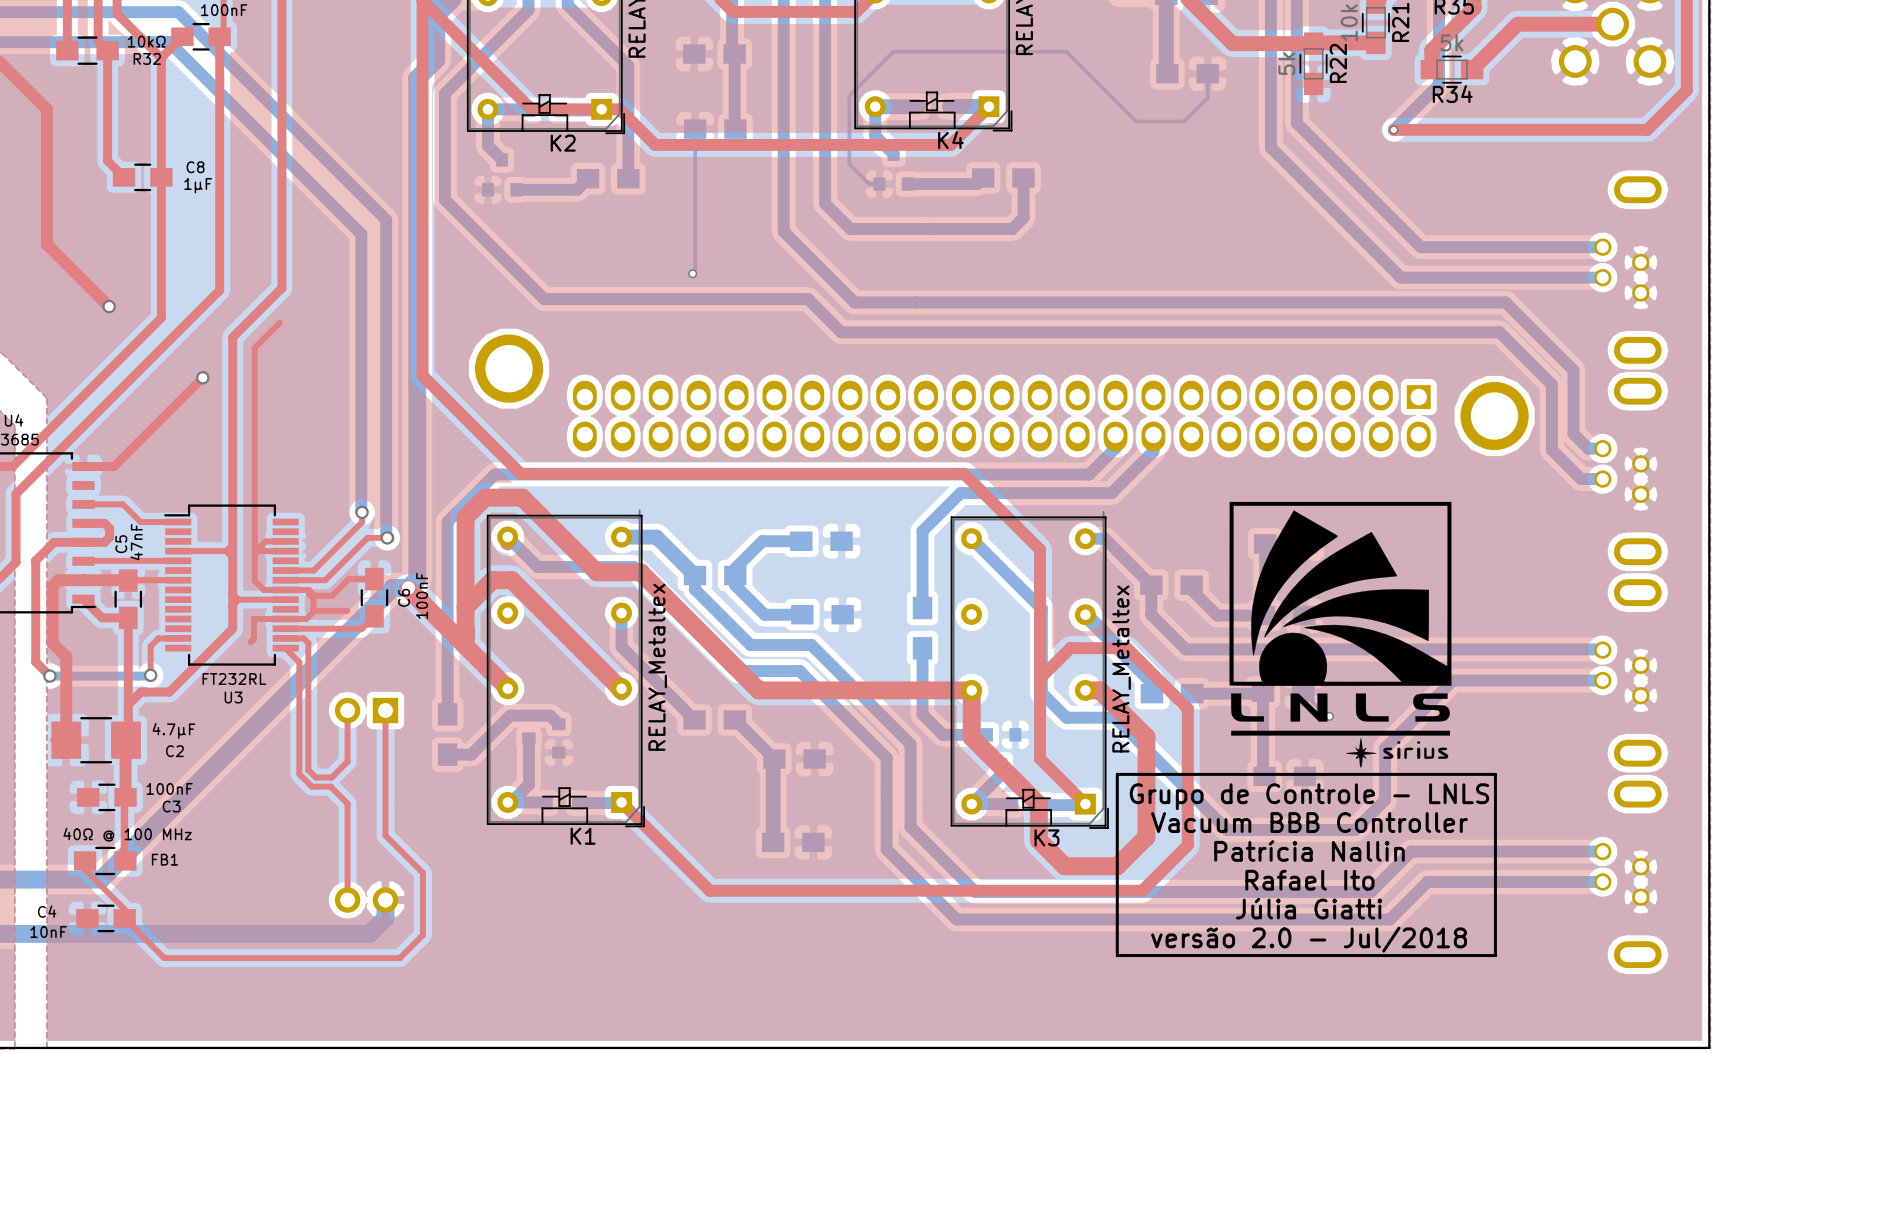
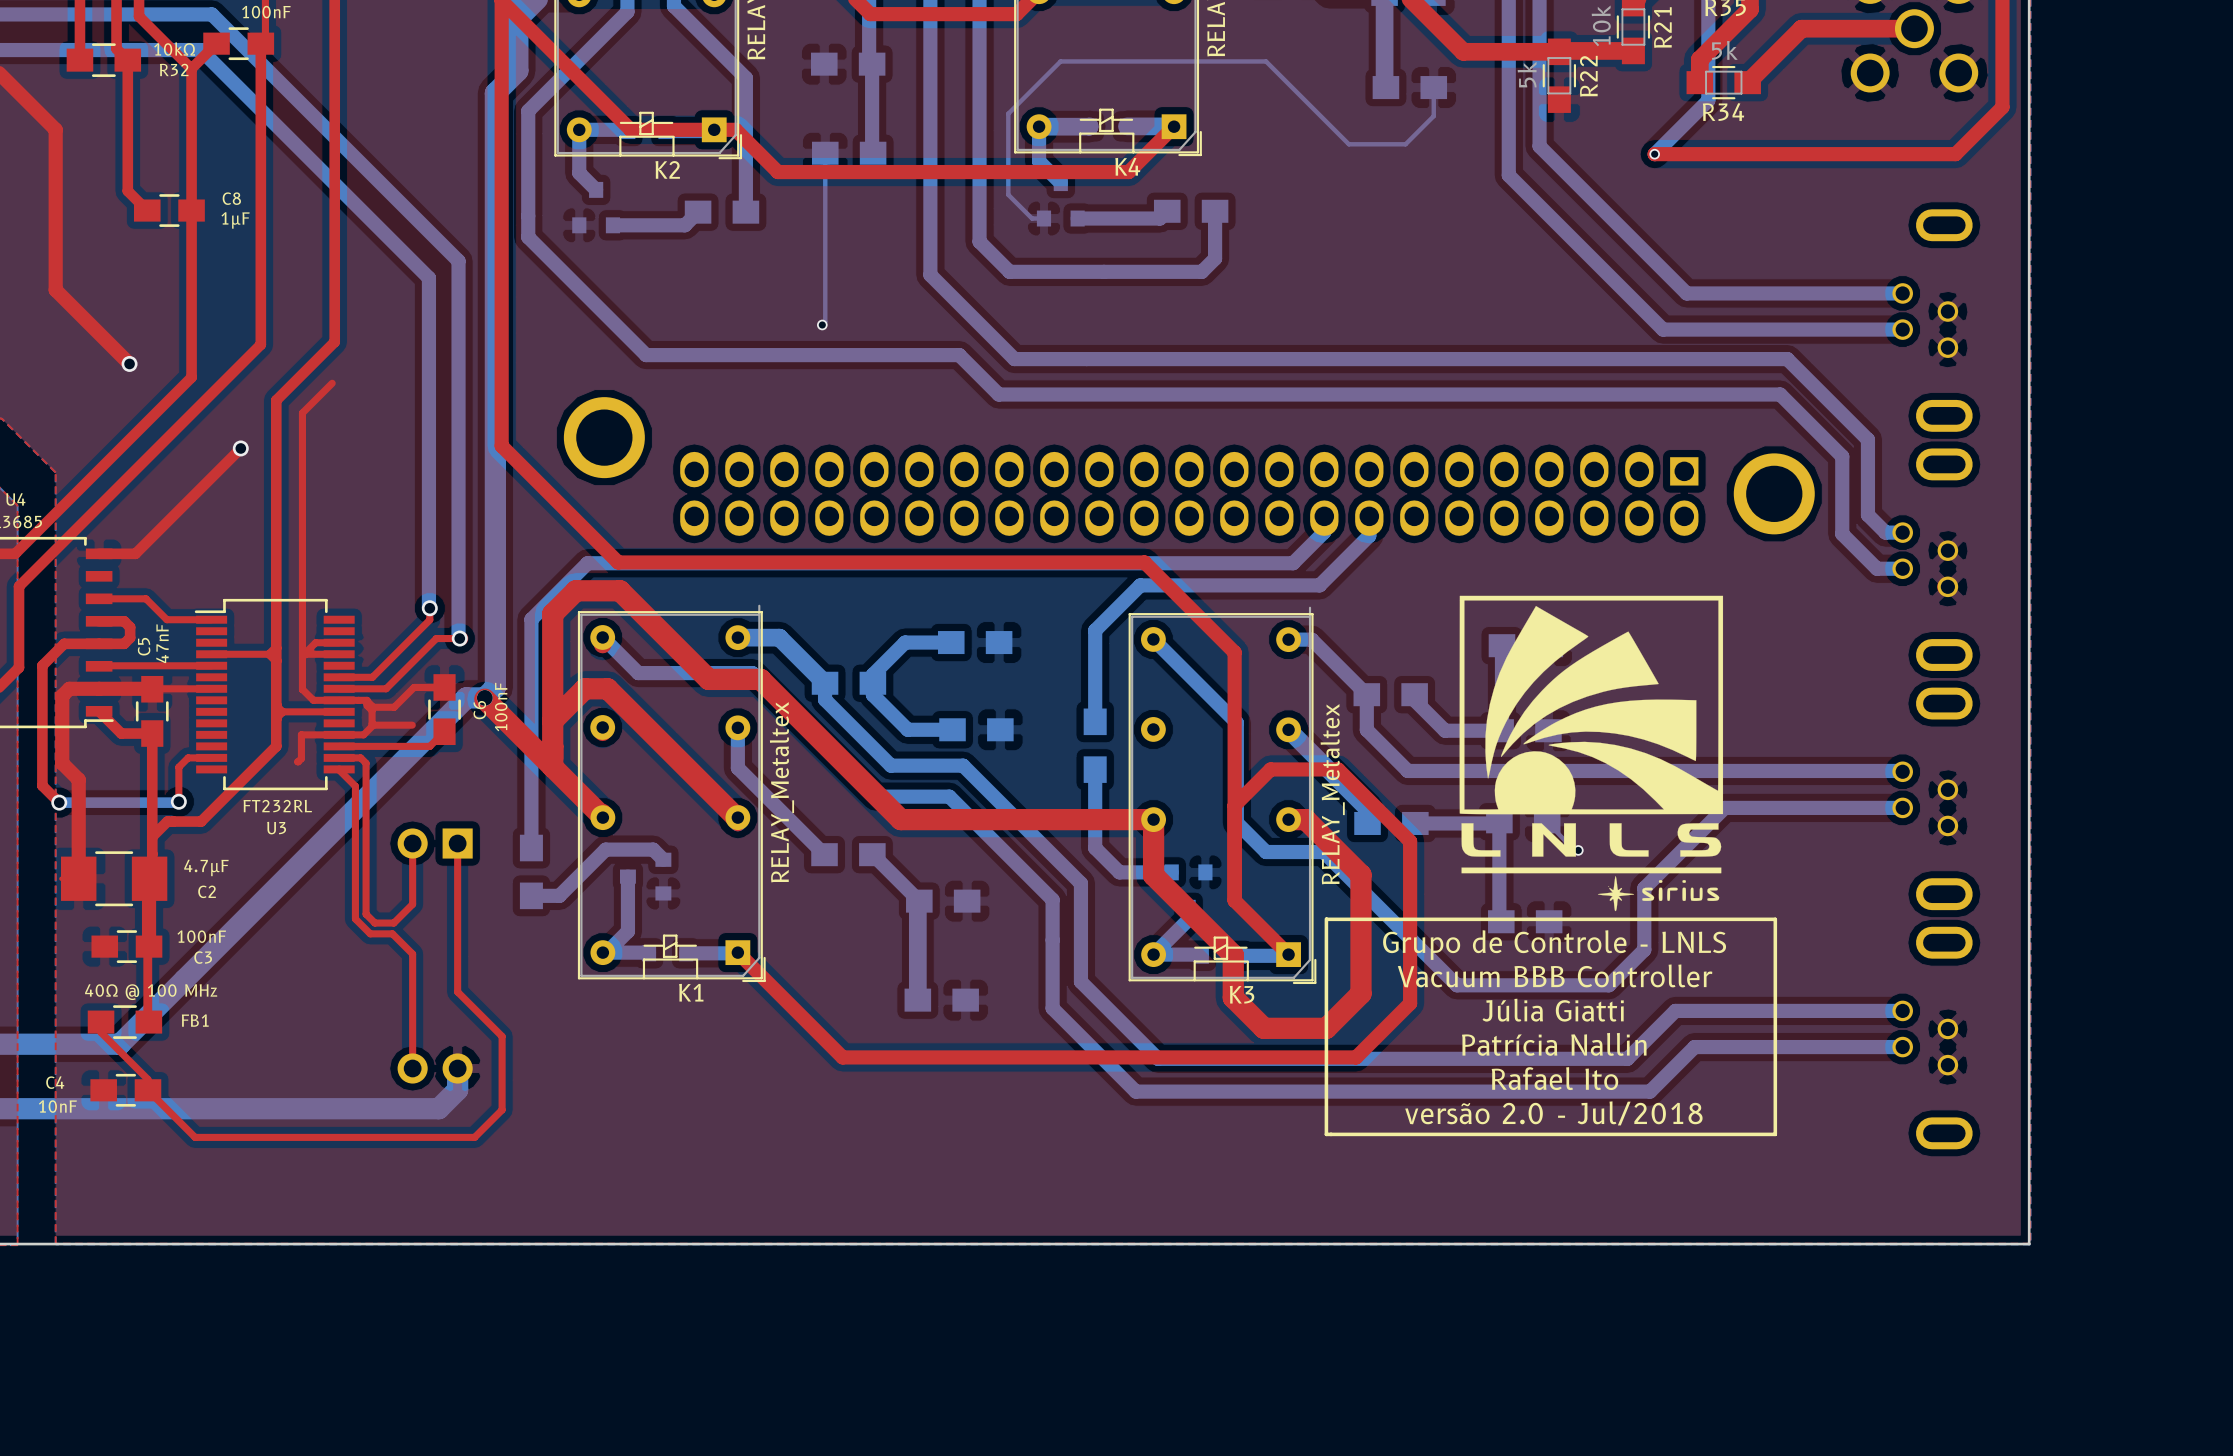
text: Patrícia Nallin (1309, 850) -> Júlia Giatti (1553, 1010)
text: Rafael Ito (1309, 880) -> Patrícia Nallin (1554, 1044)
text: Júlia Giatti (1309, 908) -> Rafael Ito (1554, 1078)

